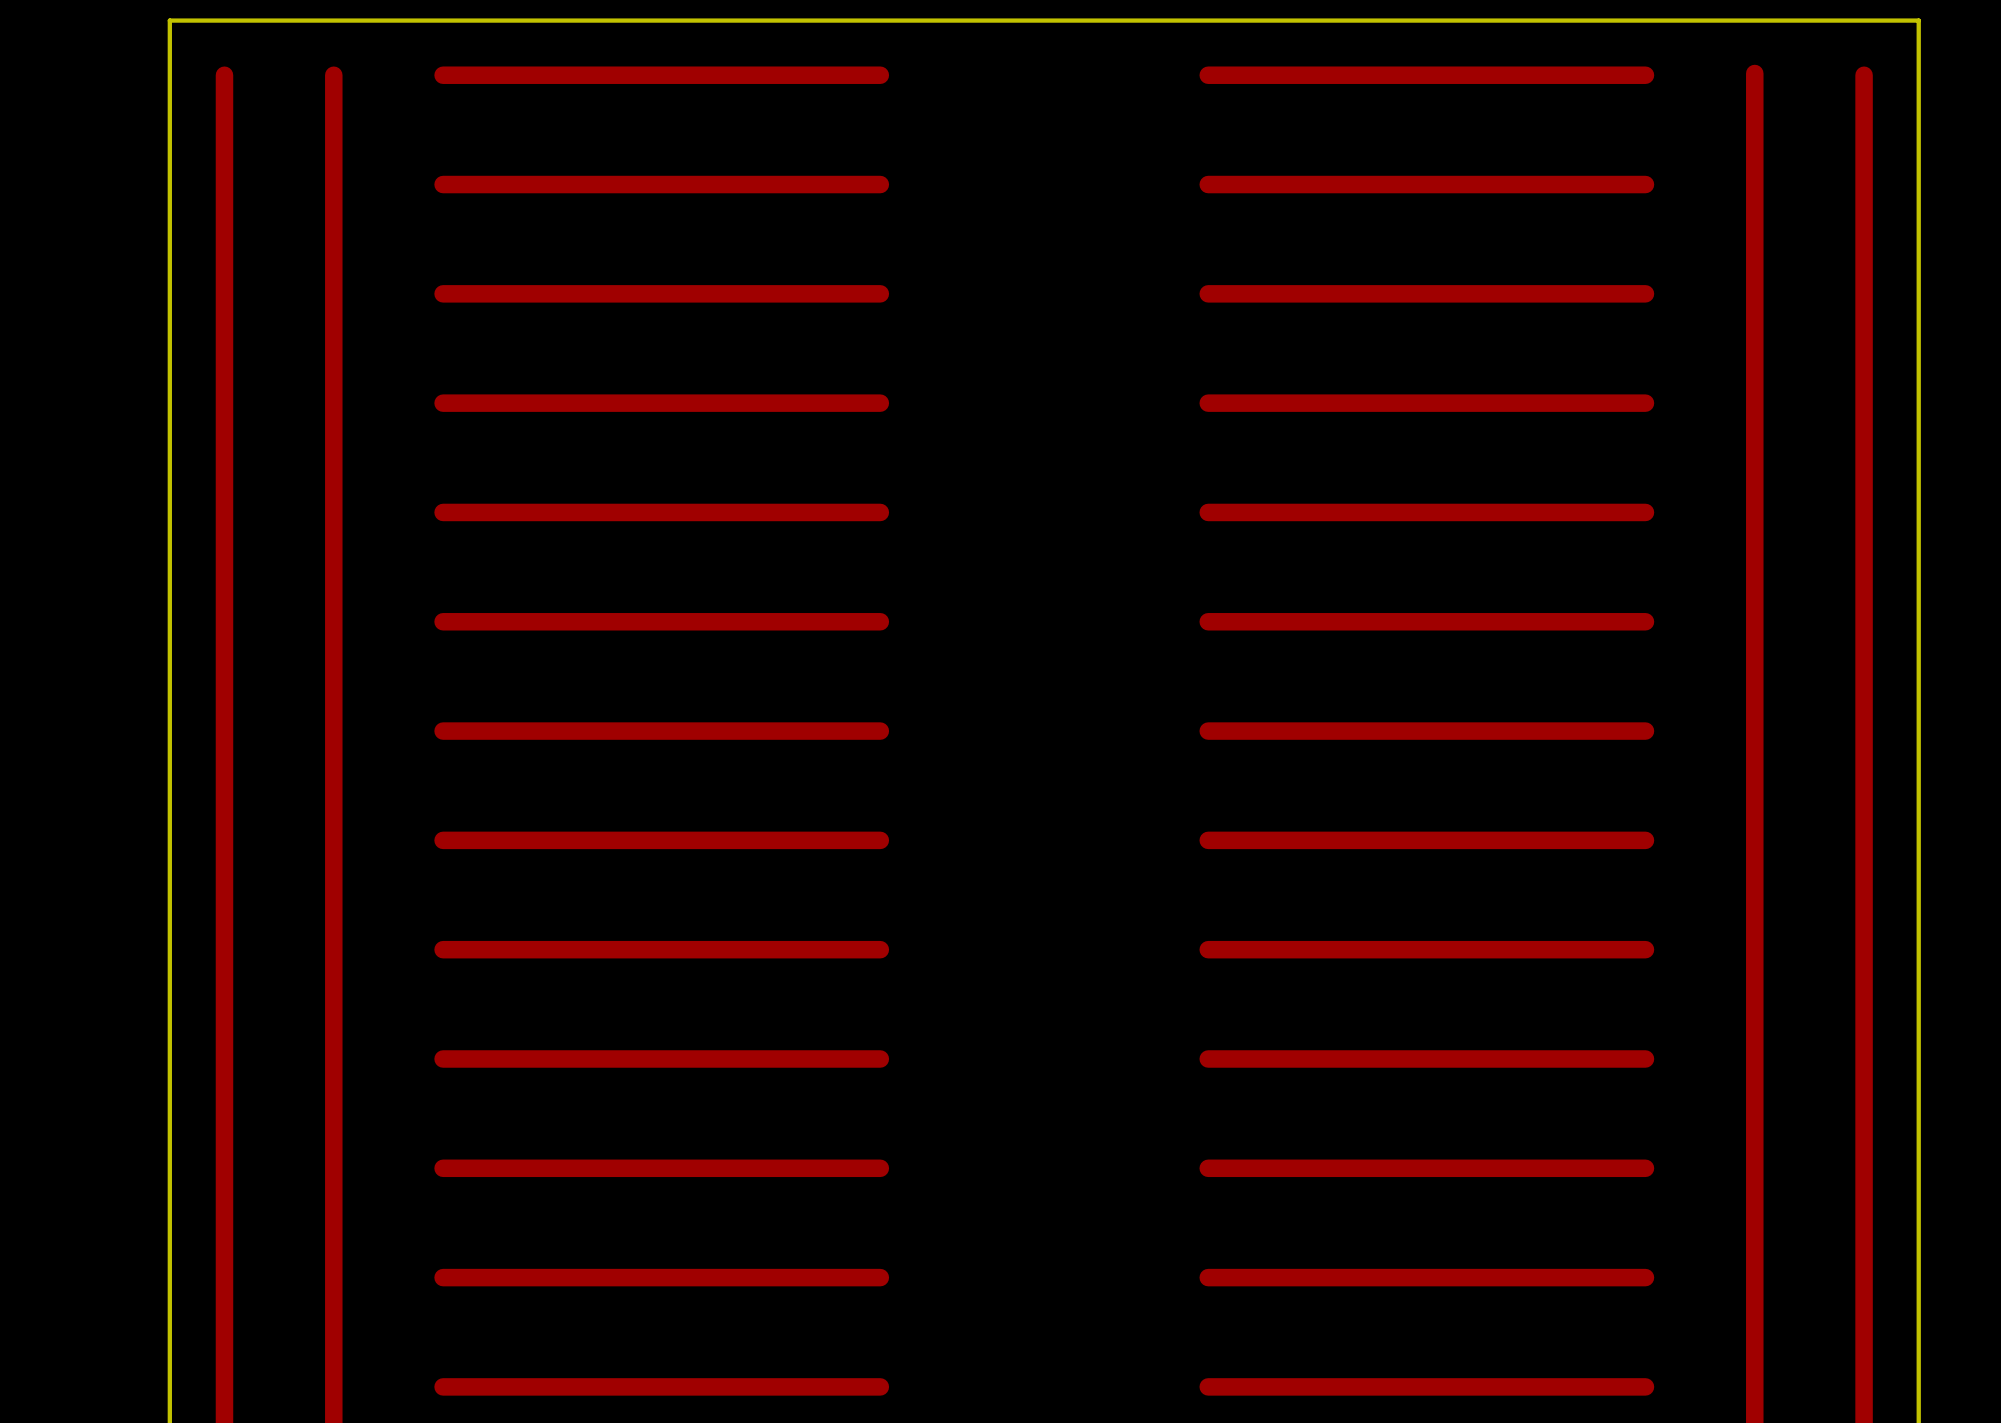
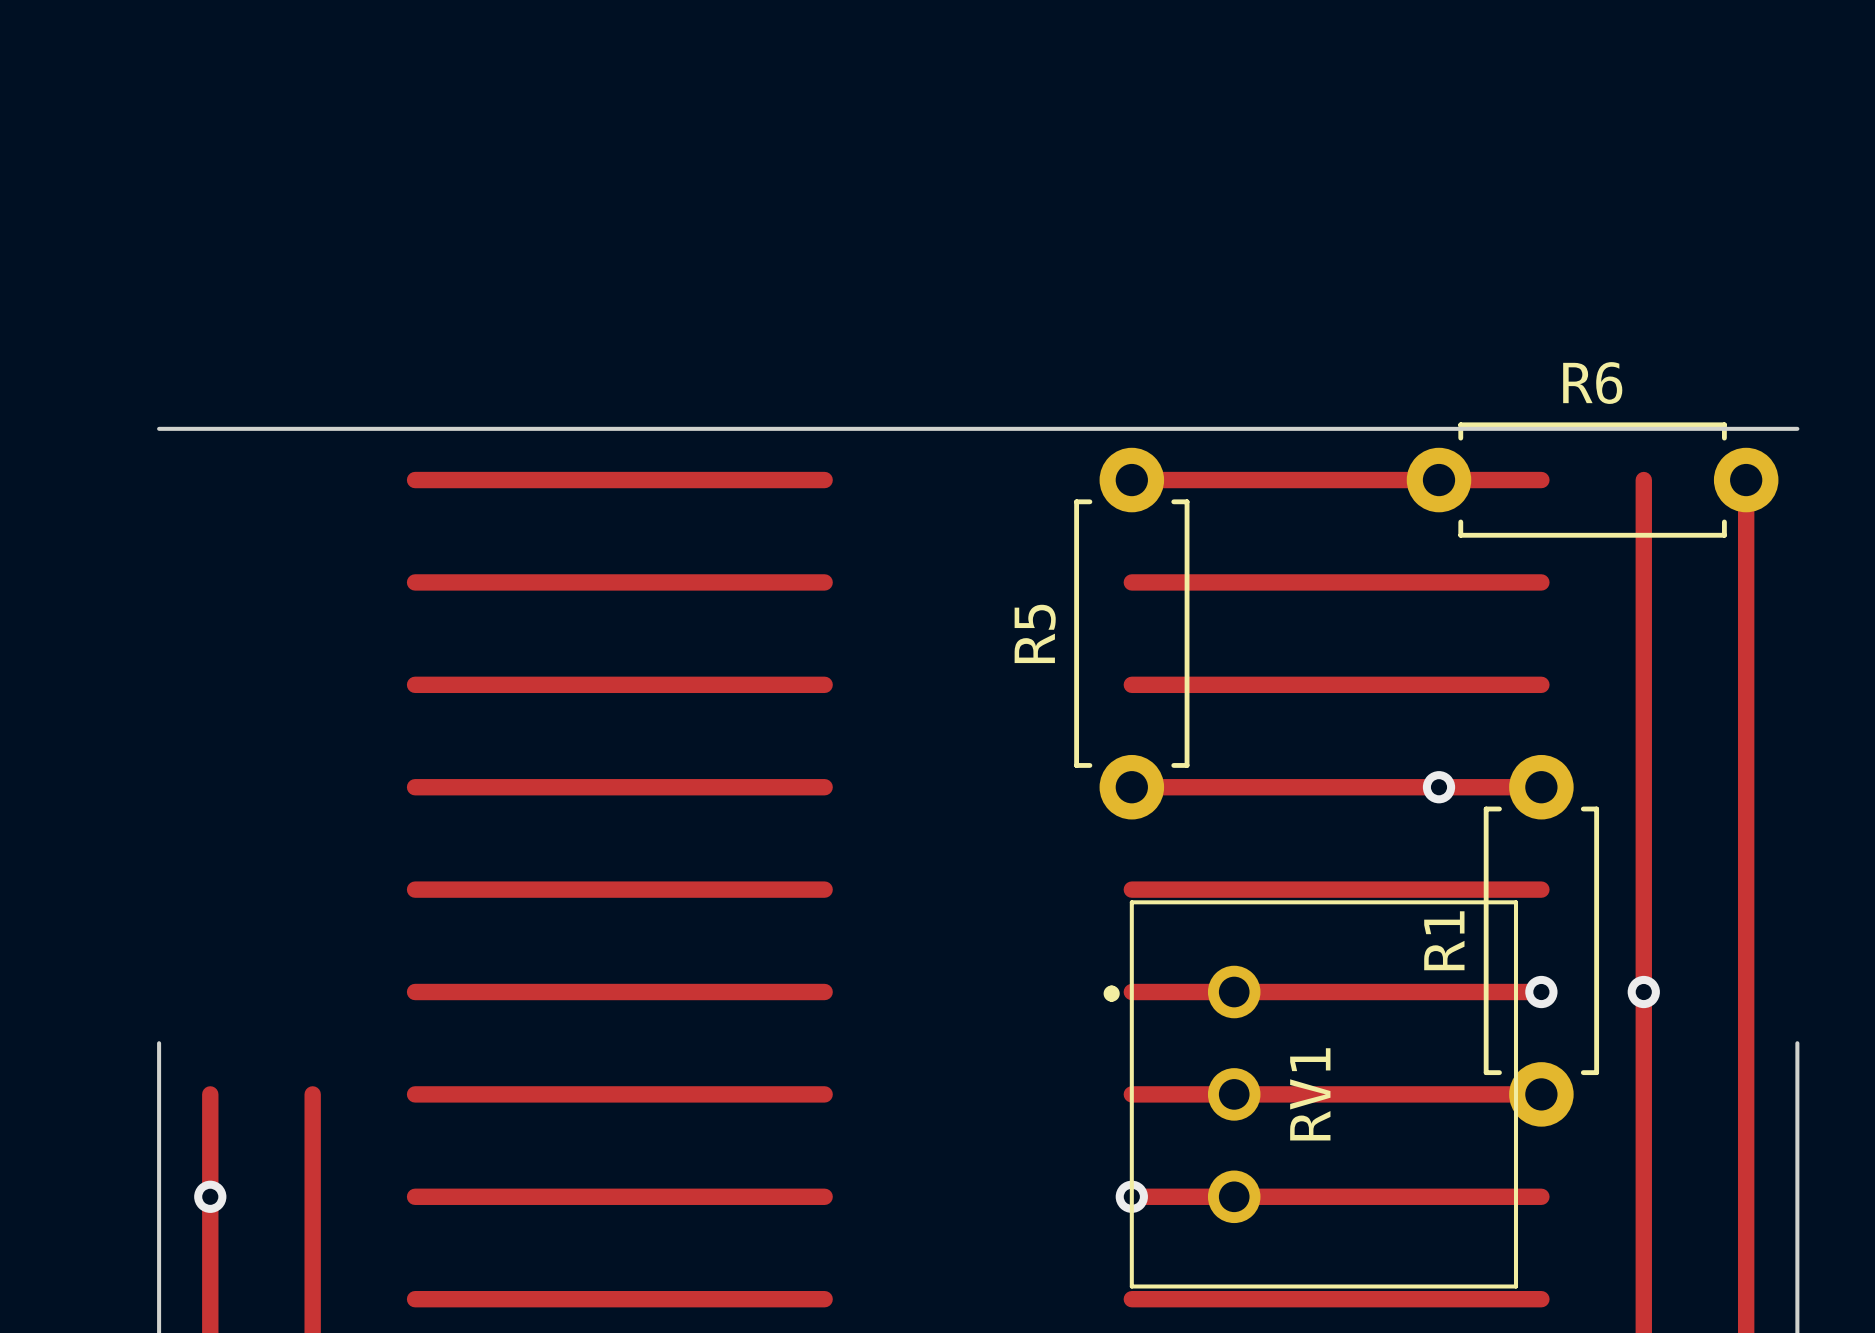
top track: (1754, 73) (1754, 512) -> none
top track: (224, 75) (224, 1168) -> none
top track: (333, 75) (333, 1168) -> none
top track: (443, 75) (880, 75) -> none
top track: (1208, 75) (1645, 75) -> none
top track: (1864, 75) (1864, 512) -> none
top track: (443, 184) (880, 184) -> none
top track: (1208, 184) (1645, 184) -> none
top track: (443, 293) (880, 293) -> none
top track: (1208, 293) (1645, 293) -> none
top track: (443, 403) (880, 403) -> none
top track: (1208, 403) (1645, 403) -> none
board edge: none -> (159, 428) (1797, 428)
R6: none -> (1592, 480)
R5: none -> (1131, 633)
via: none -> (1439, 787)
R1: none -> (1541, 940)
via: none -> (1541, 992)
via: none -> (1643, 992)
board edge: (169, 1113) (169, 20) (1918, 20) (1918, 1113) -> none
RV1: none -> (1310, 1094)
via: none -> (210, 1196)
via: none -> (1131, 1196)

